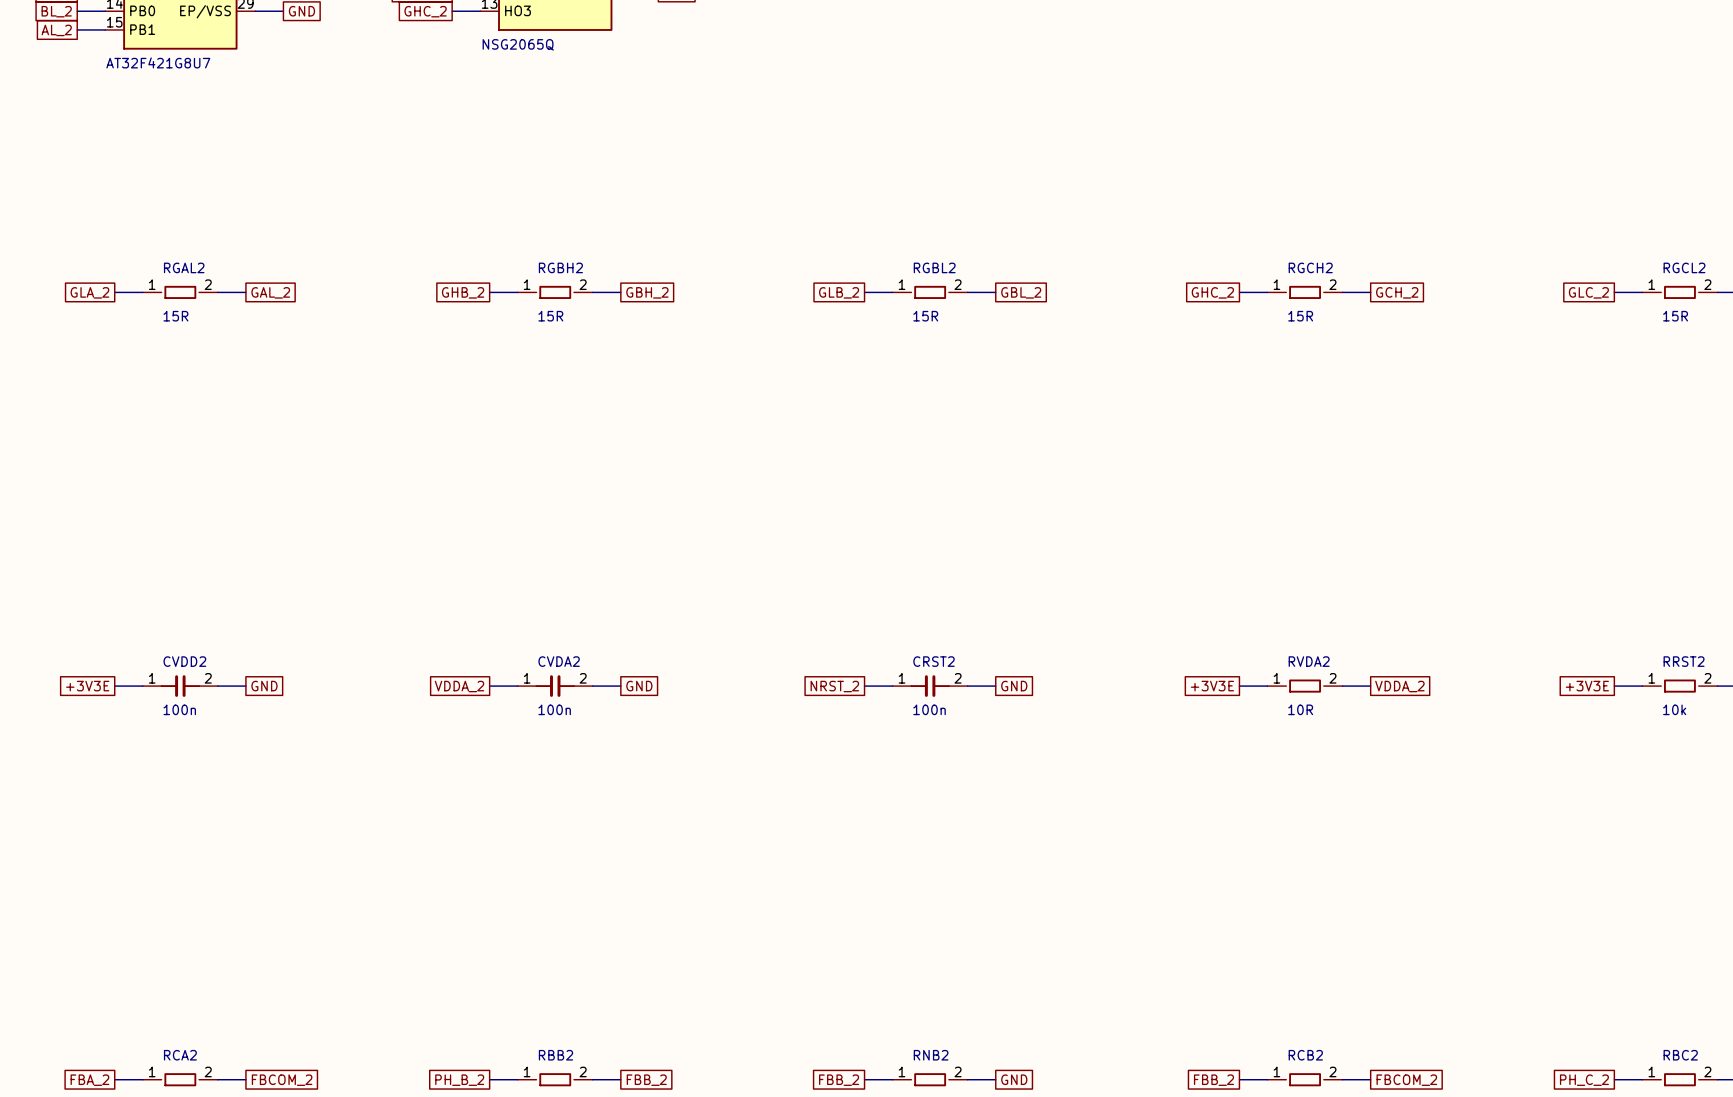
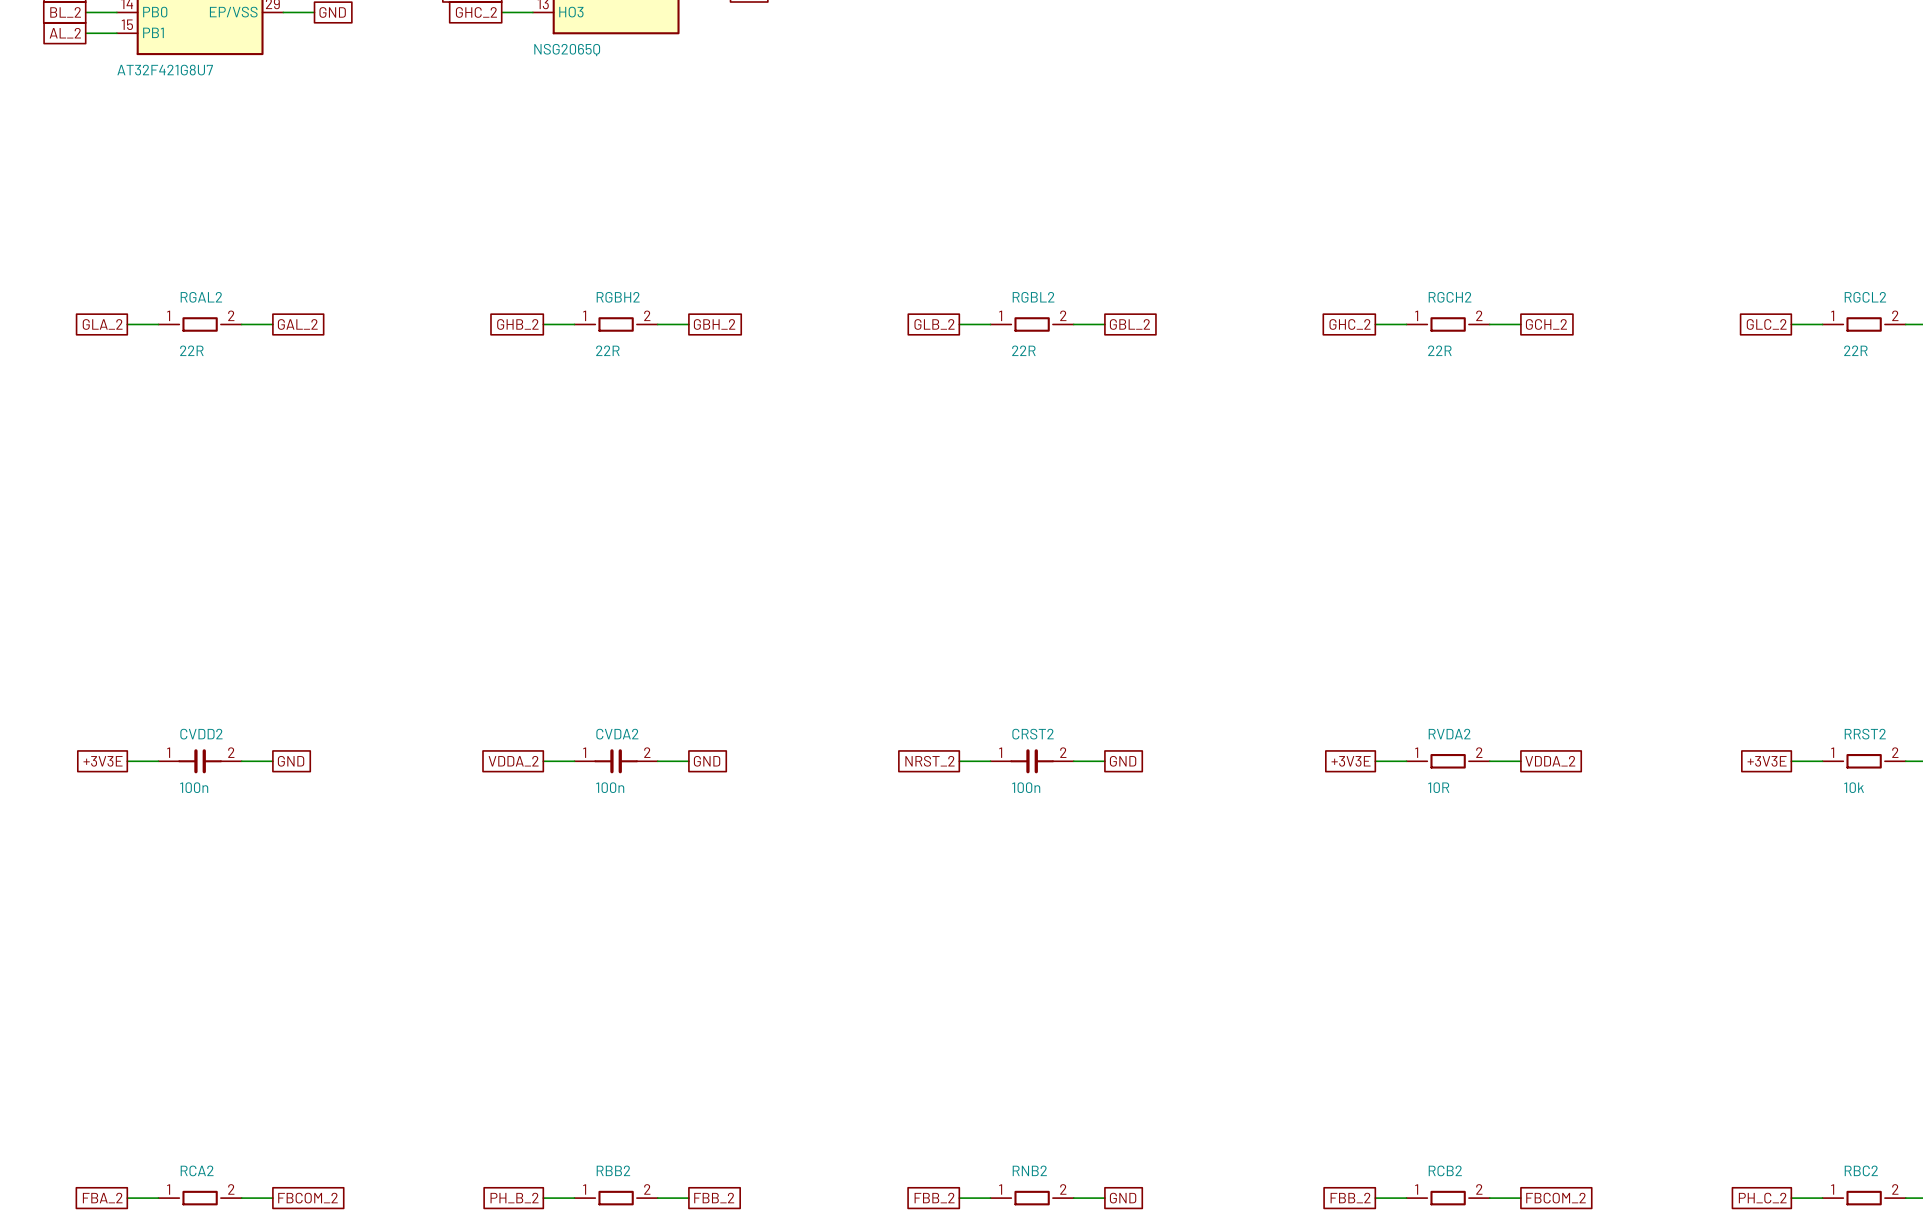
RGAL2 value: 15R (175, 316) -> 22R (191, 350)
RGBH2 value: 15R (550, 316) -> 22R (607, 350)
RGBL2 value: 15R (925, 316) -> 22R (1023, 350)
RGCH2 value: 15R (1300, 316) -> 22R (1439, 350)
RGCL2 value: 15R (1675, 316) -> 22R (1855, 350)

